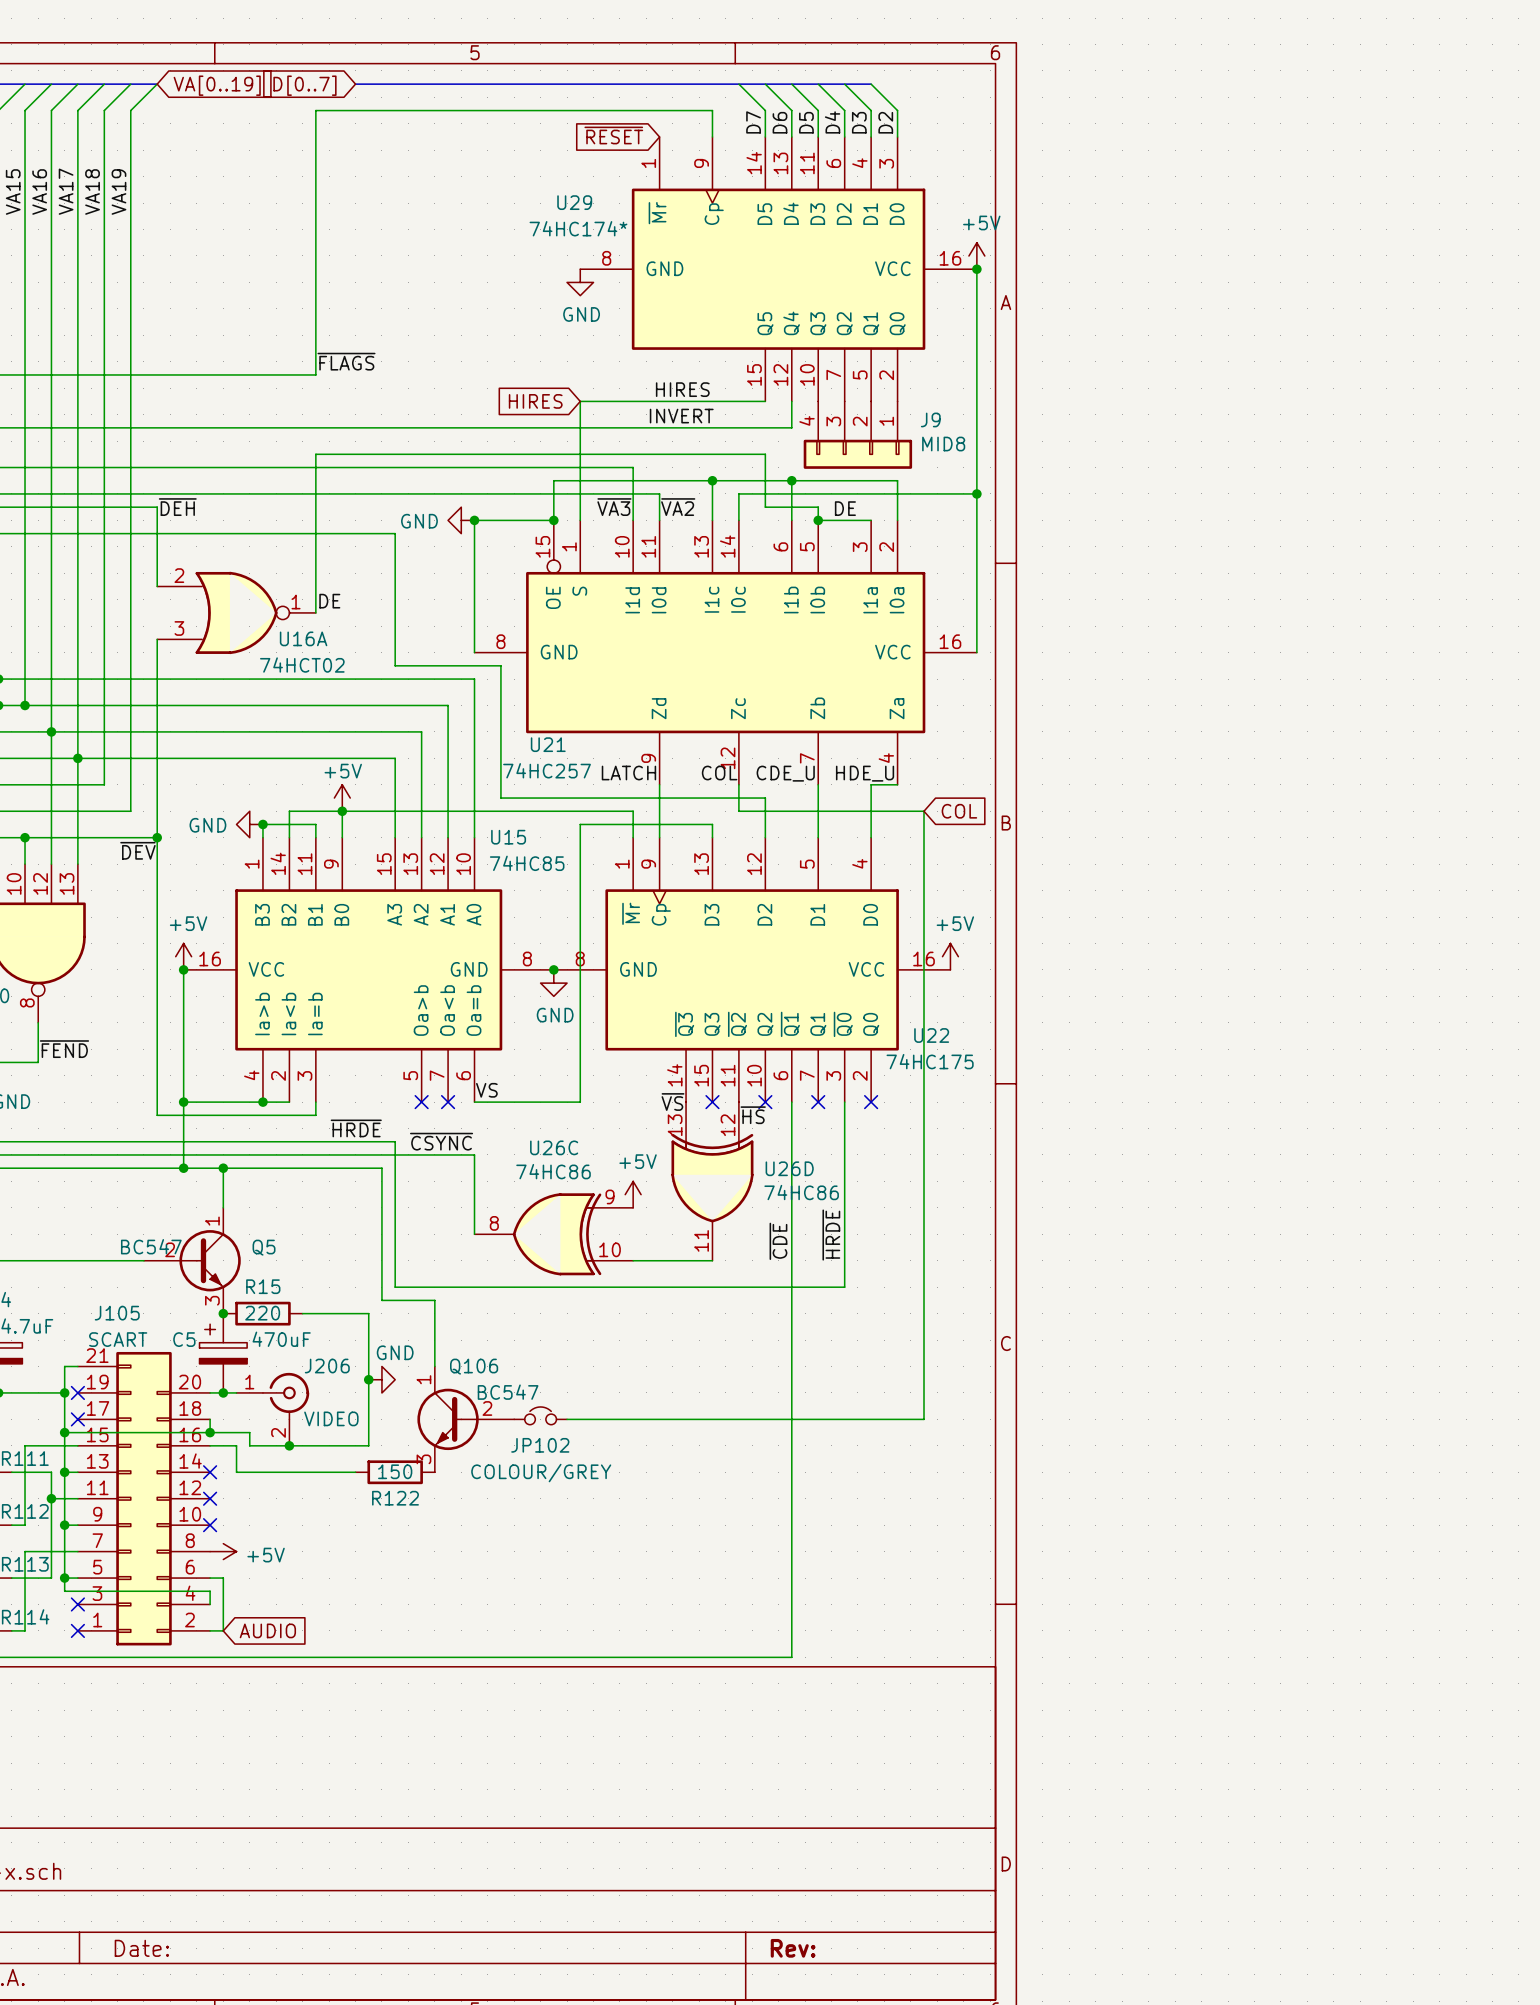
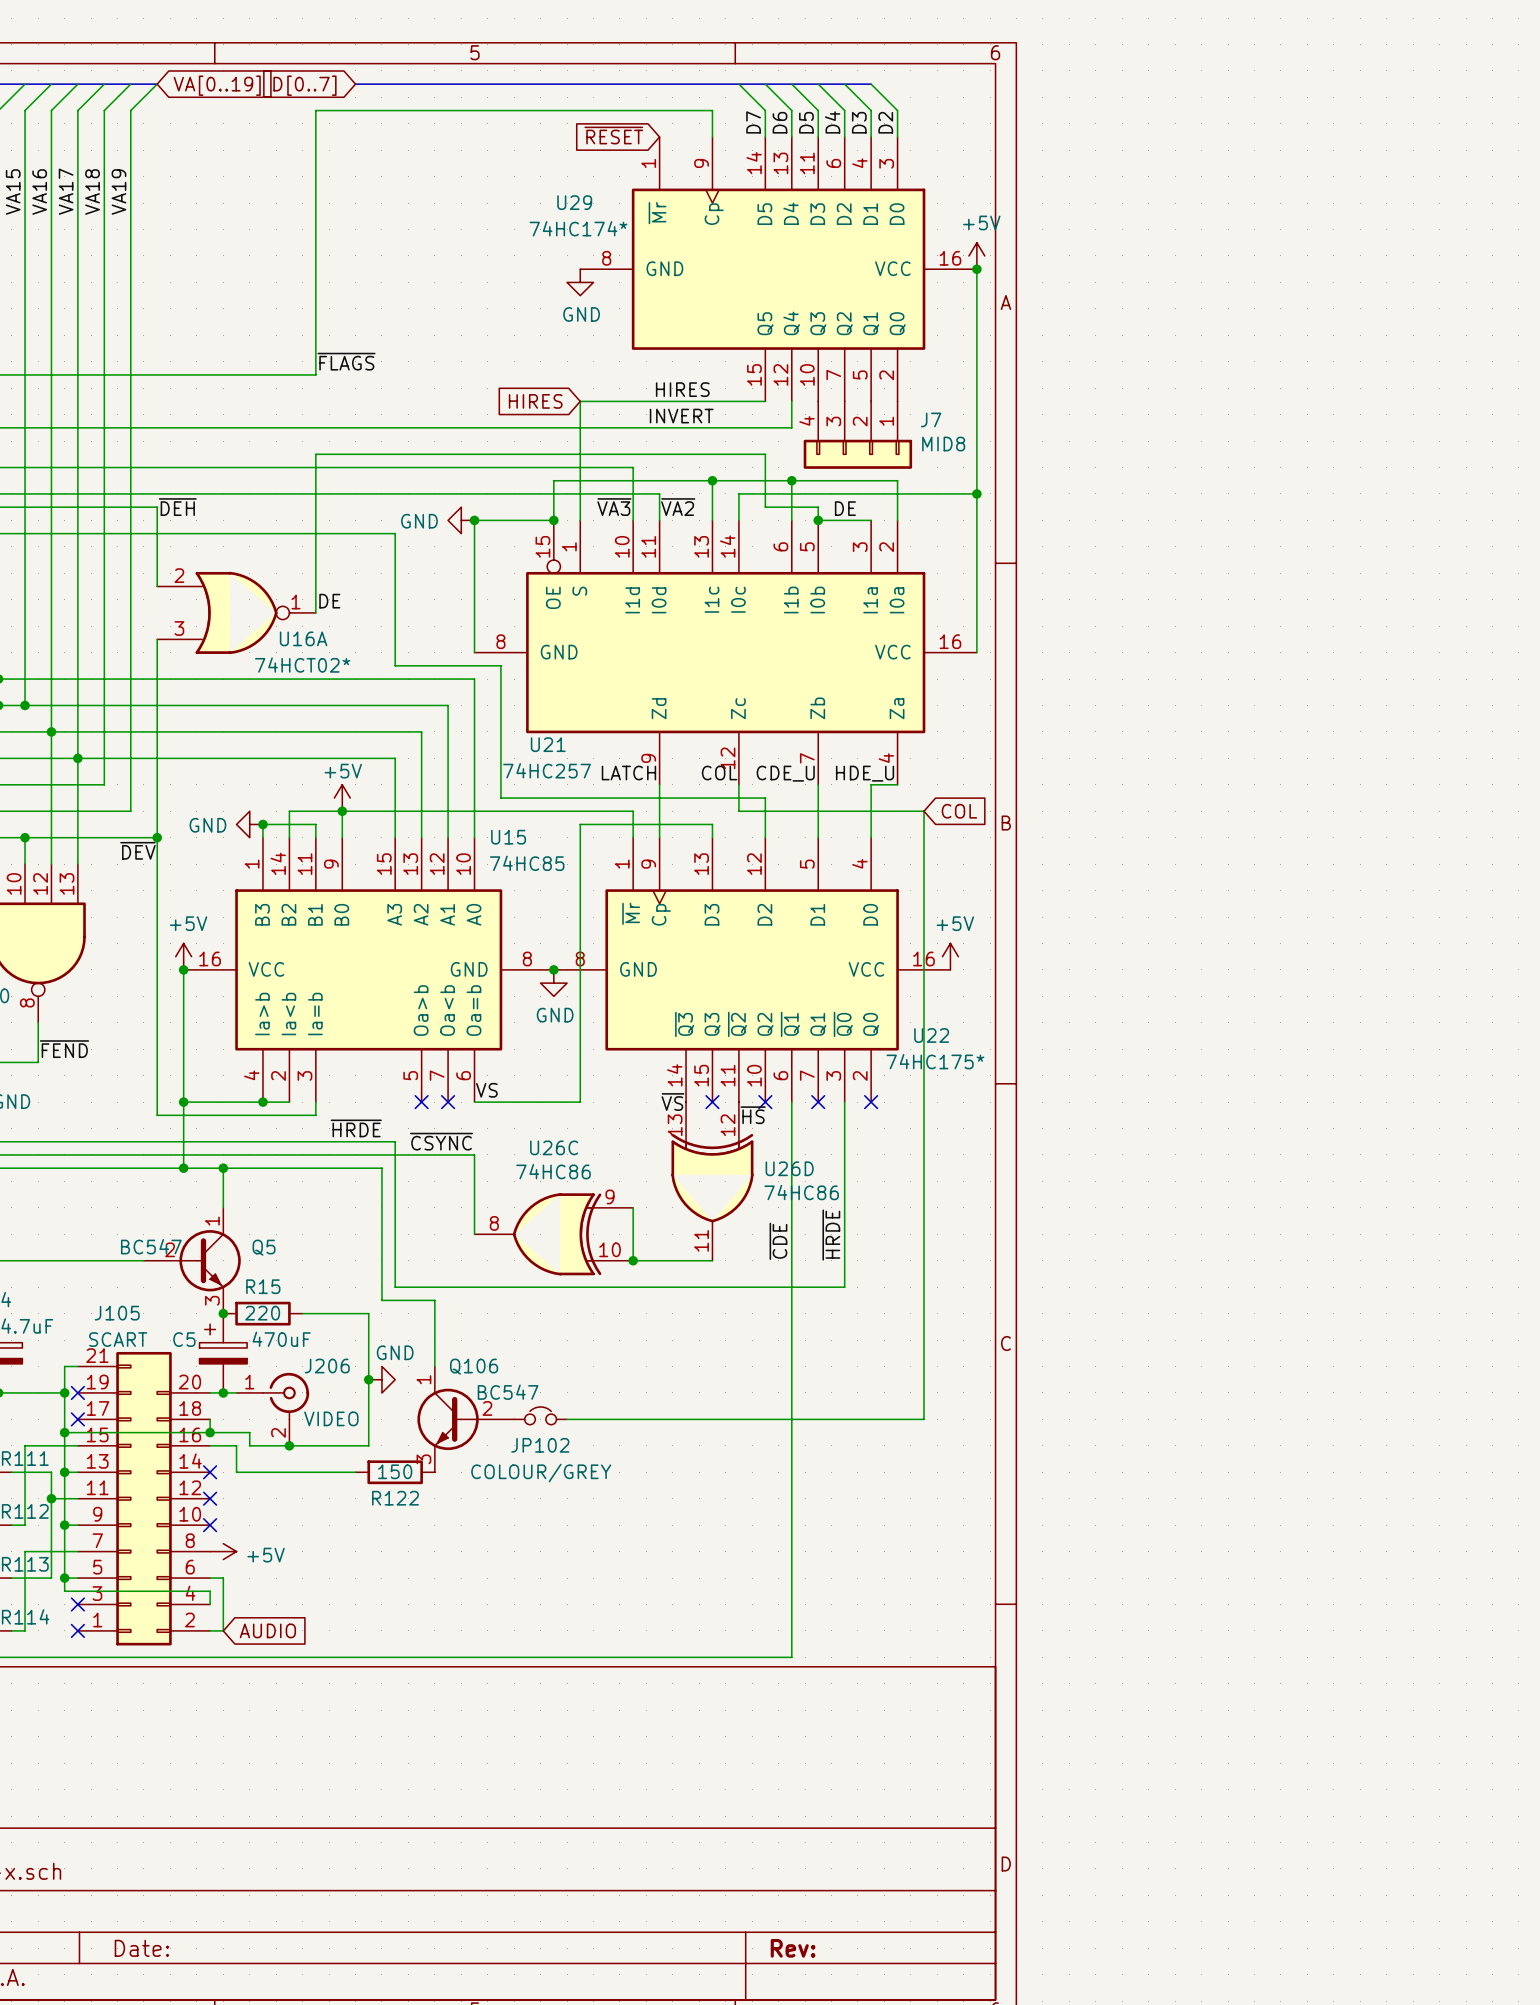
J9 name: J9 (930, 419) -> J7 (931, 419)
U16A value: 74HCT02 (302, 665) -> 74HCT02* (302, 665)
U22 value: 74HC175 (930, 1061) -> 74HC175* (935, 1061)
power symbol: +5V (633, 1194) -> none
wire: none -> (633, 1207) (633, 1260)
junction: none -> (633, 1260)

